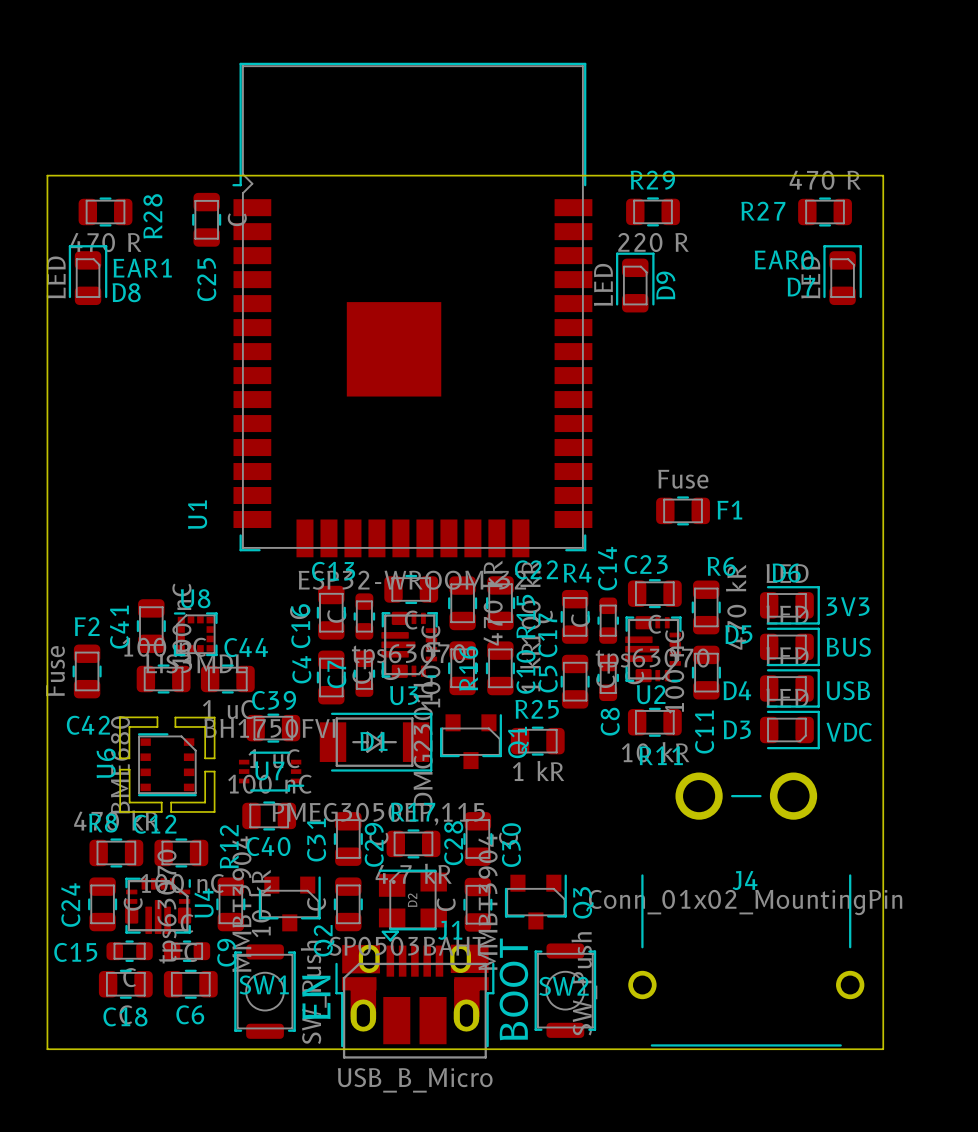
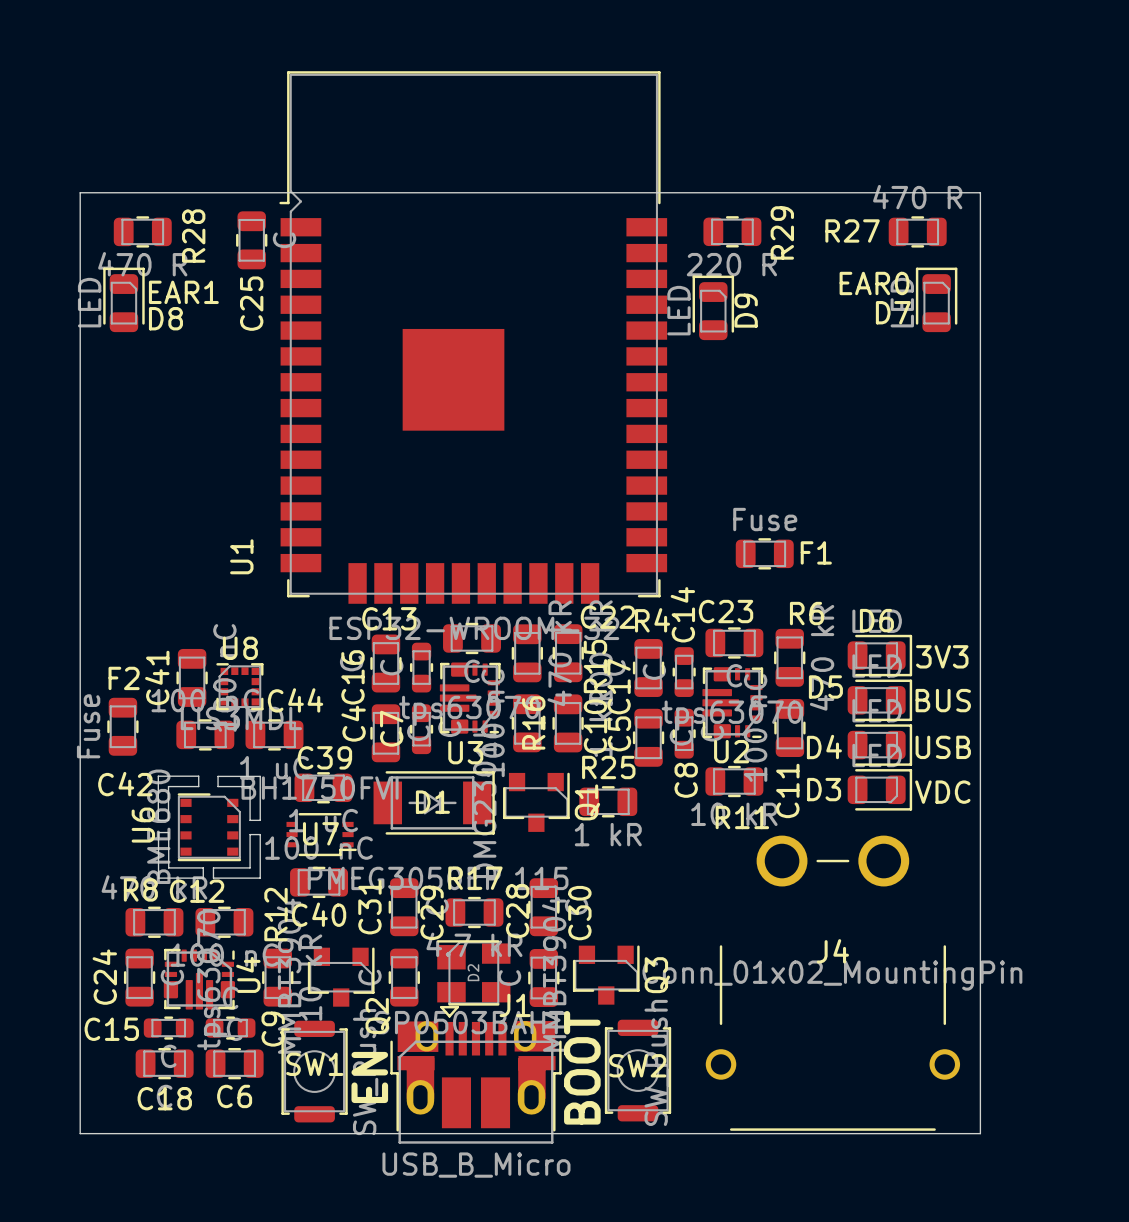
R29 name rotation: 0° (652, 180) -> 90° counterclockwise (782, 232)

